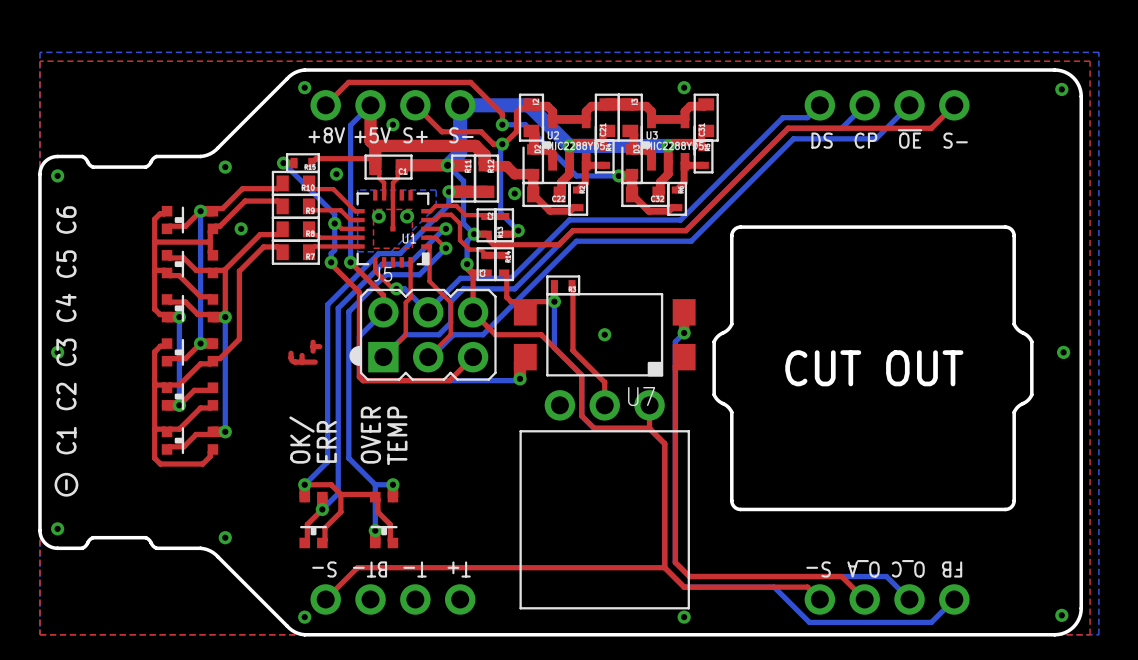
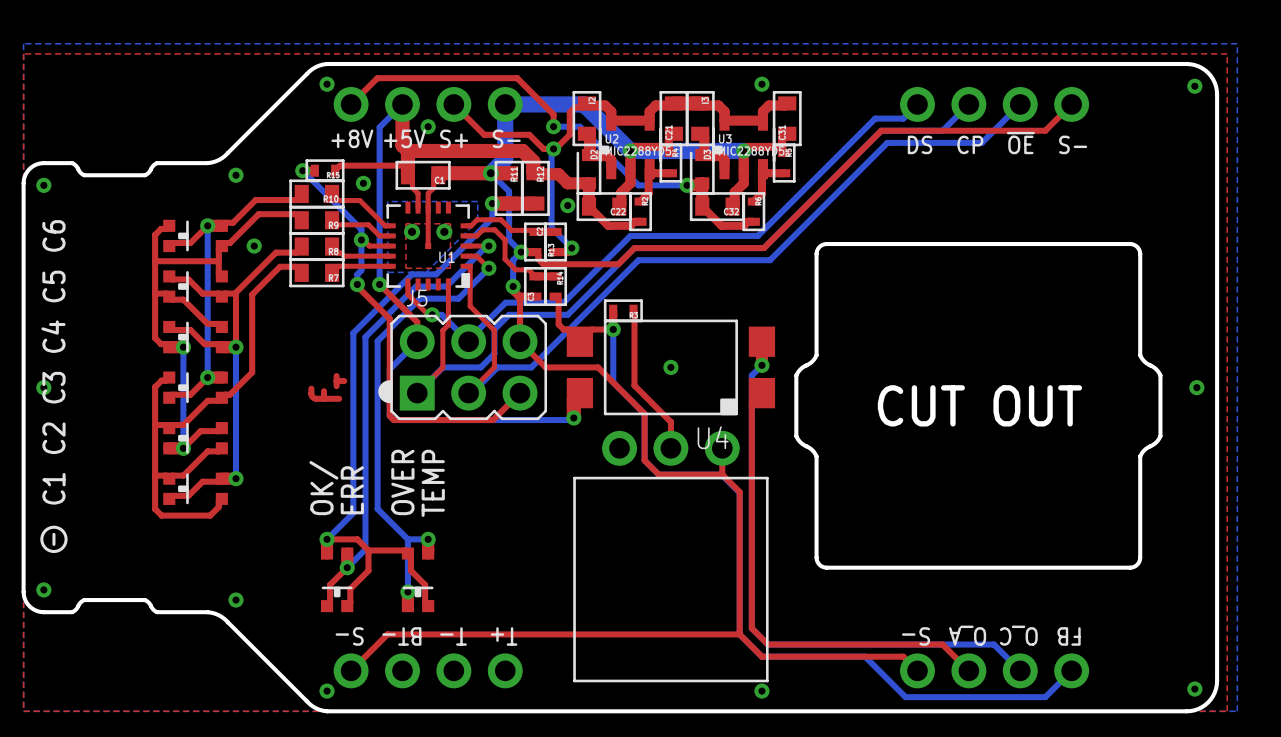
U7 name: U7 (641, 396) -> U4 (713, 437)

